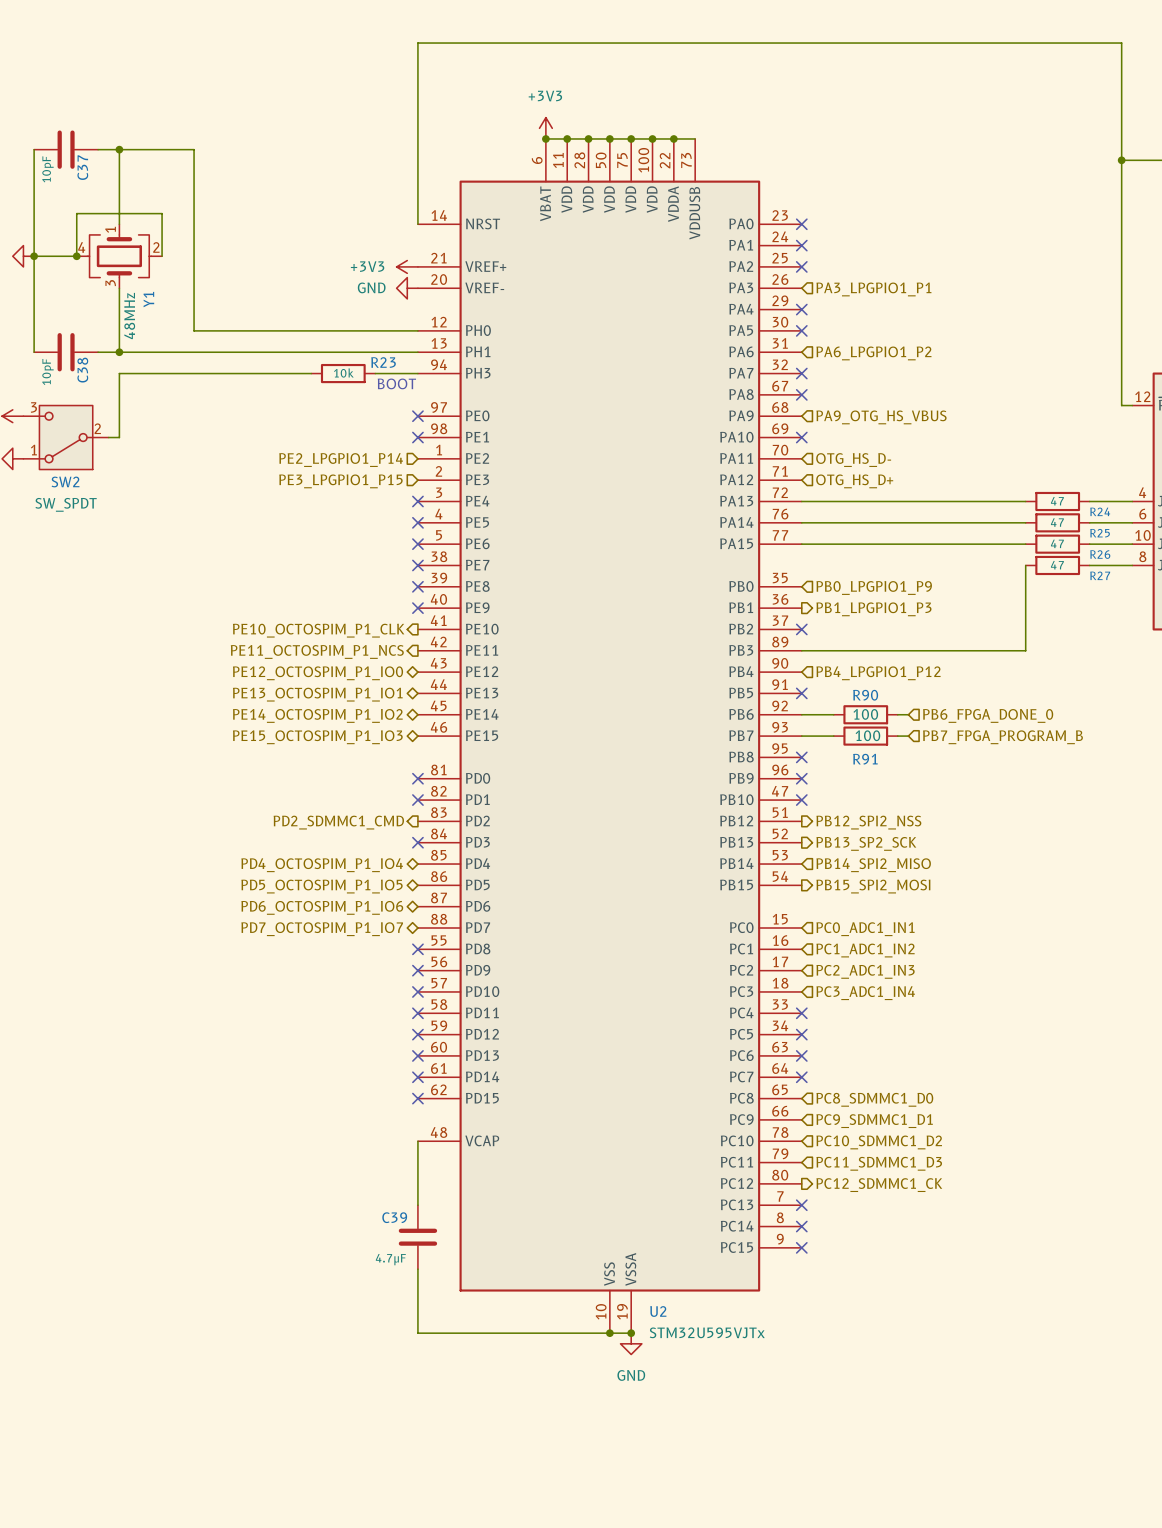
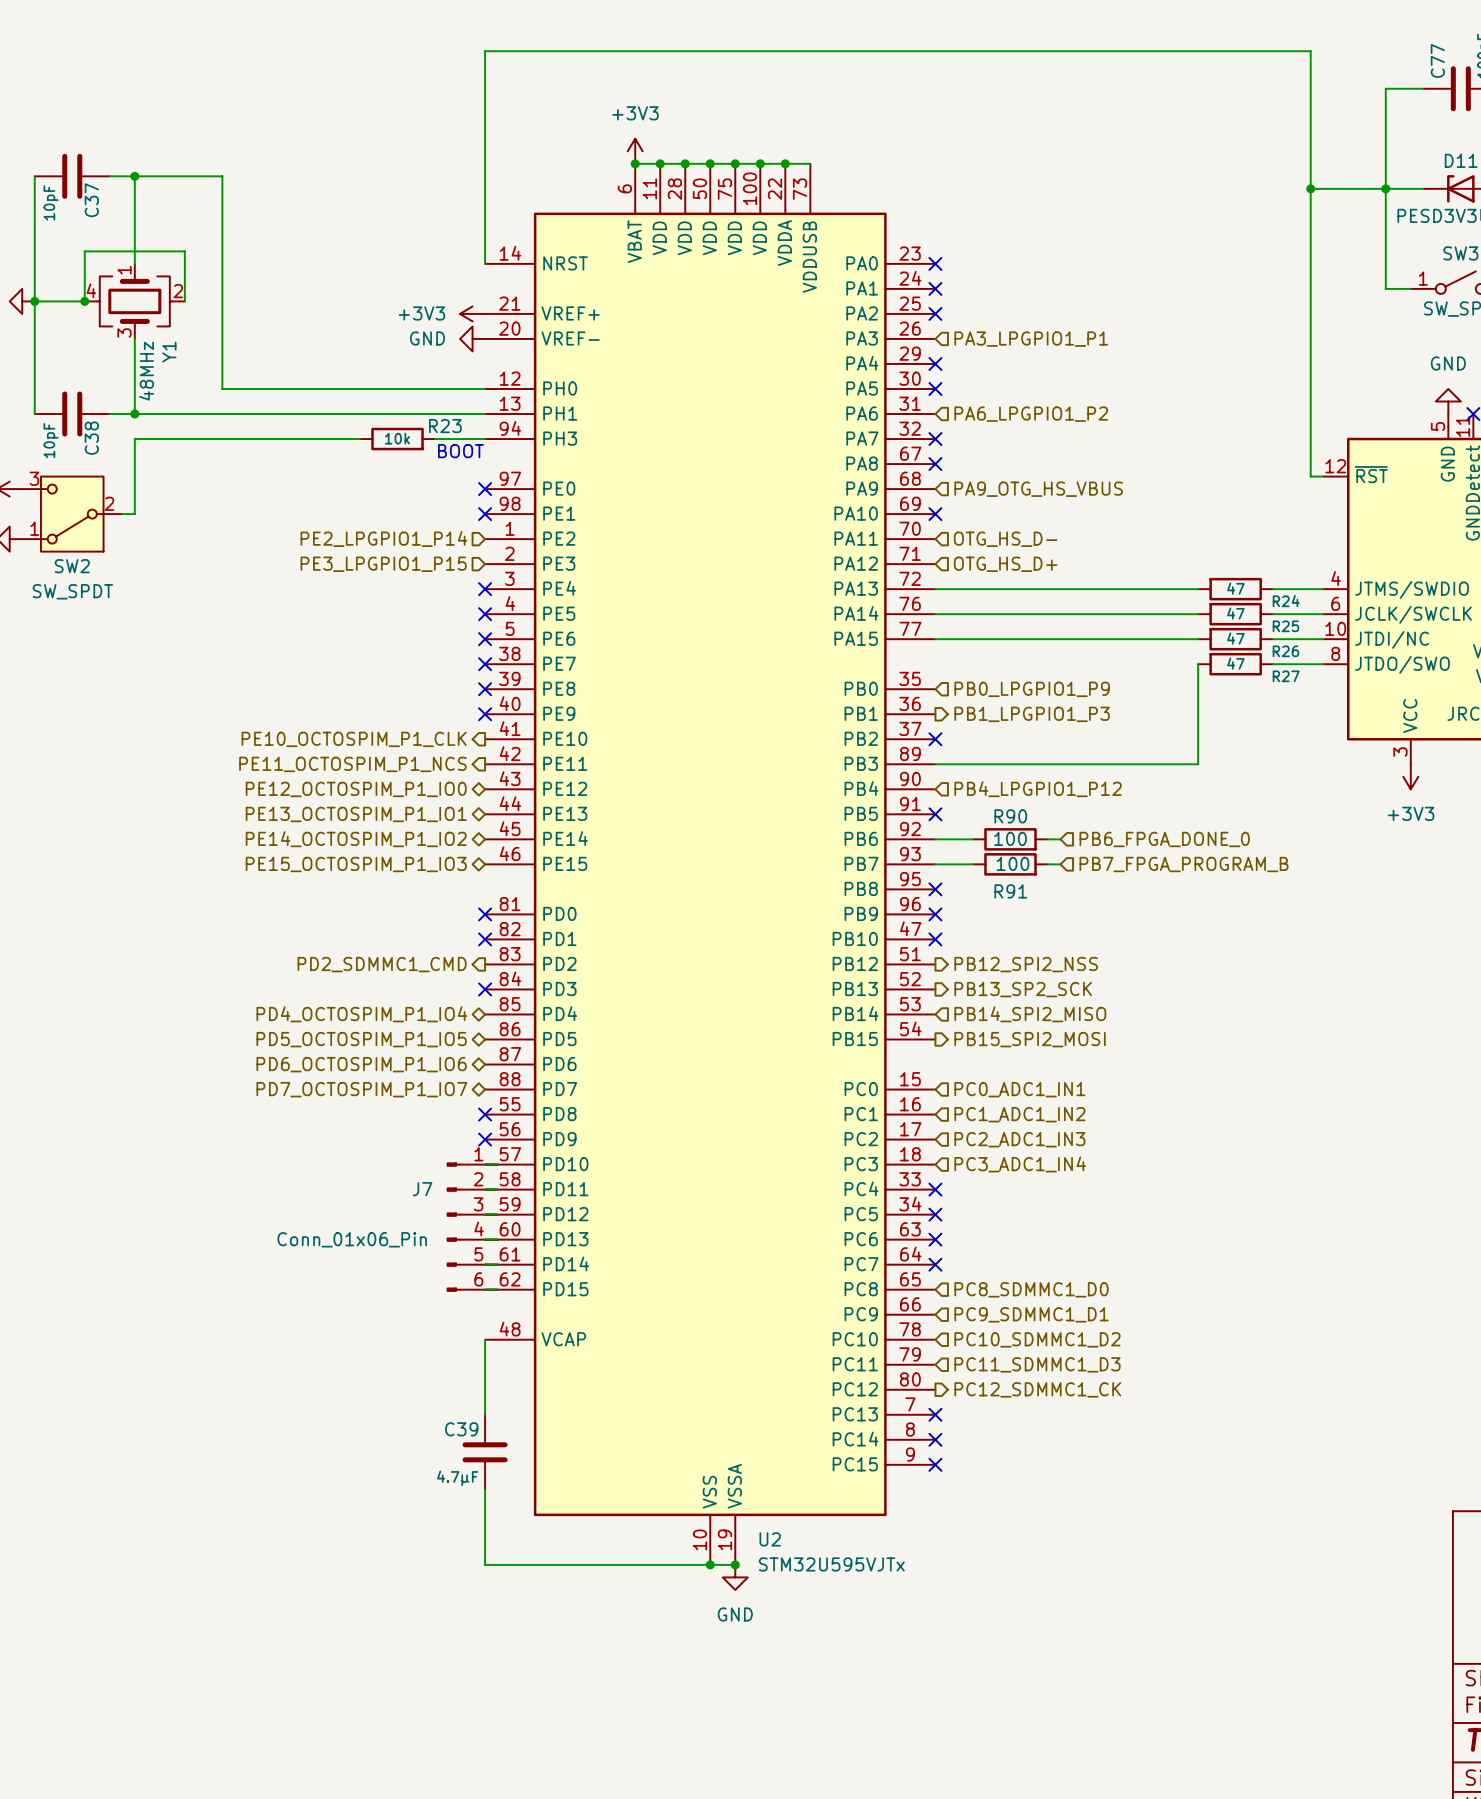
no-connect mark: (417, 991) -> none
no-connect mark: (417, 1013) -> none
no-connect mark: (417, 1034) -> none
J7: none -> Conn_01x06_Pin (472, 1227)
no-connect mark: (417, 1055) -> none
no-connect mark: (417, 1077) -> none
no-connect mark: (417, 1098) -> none

